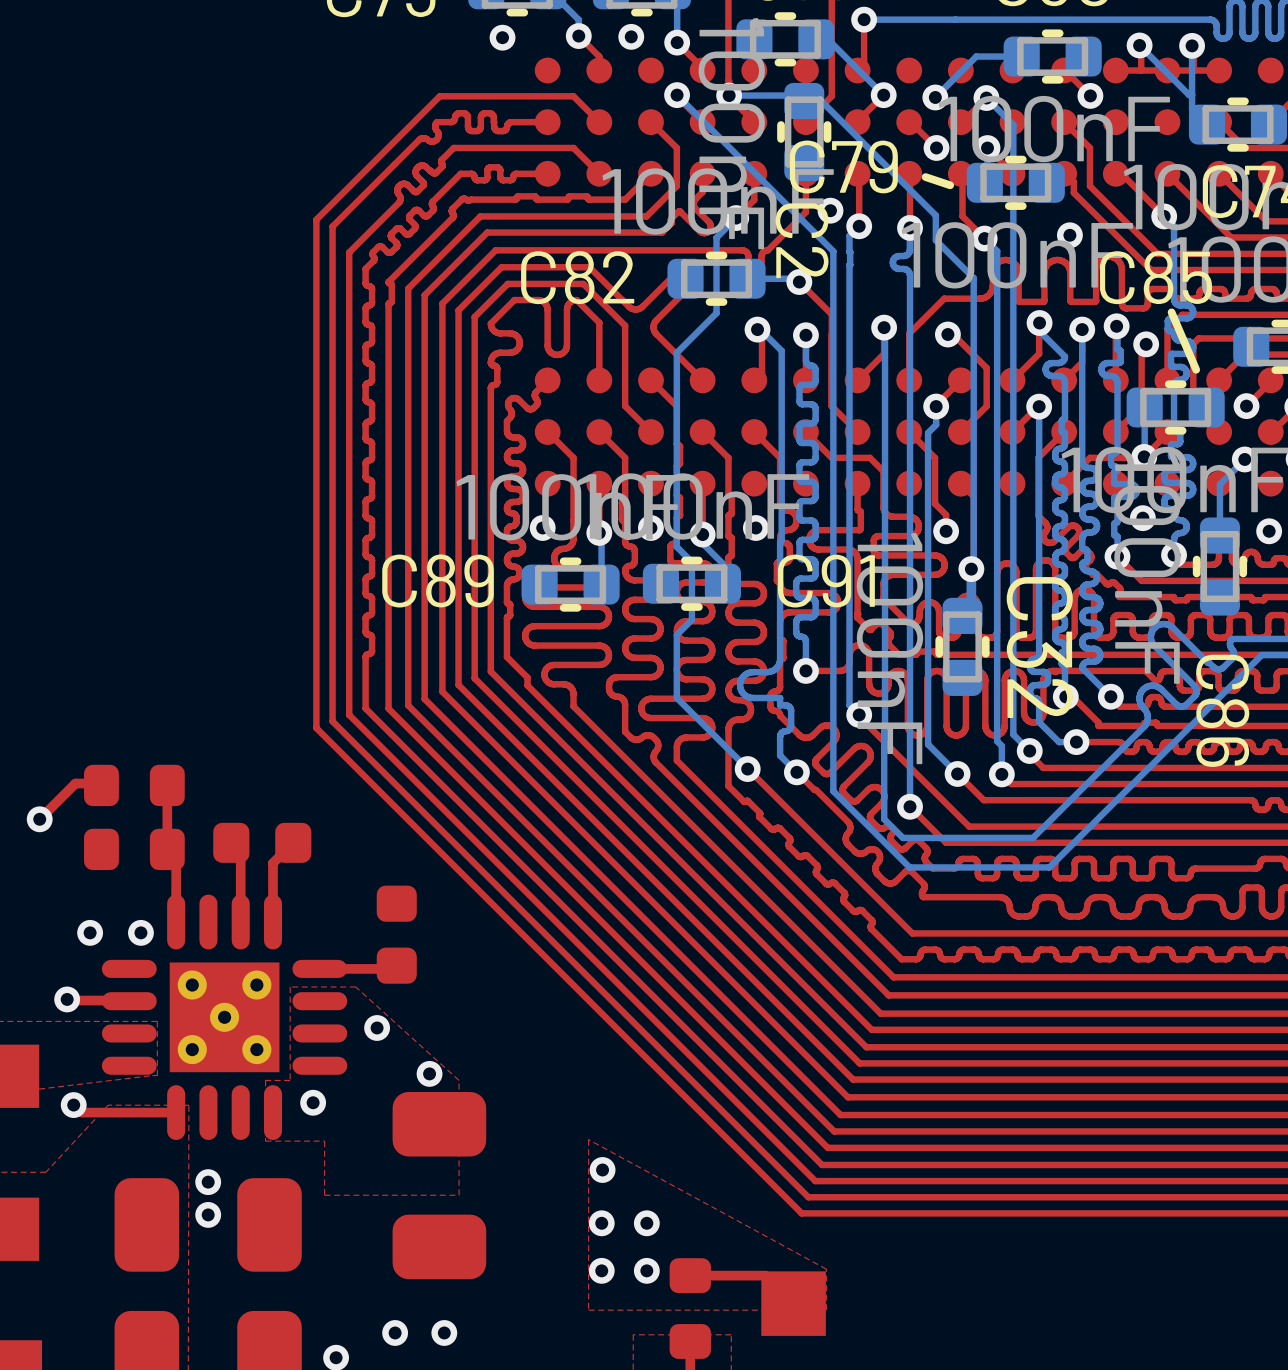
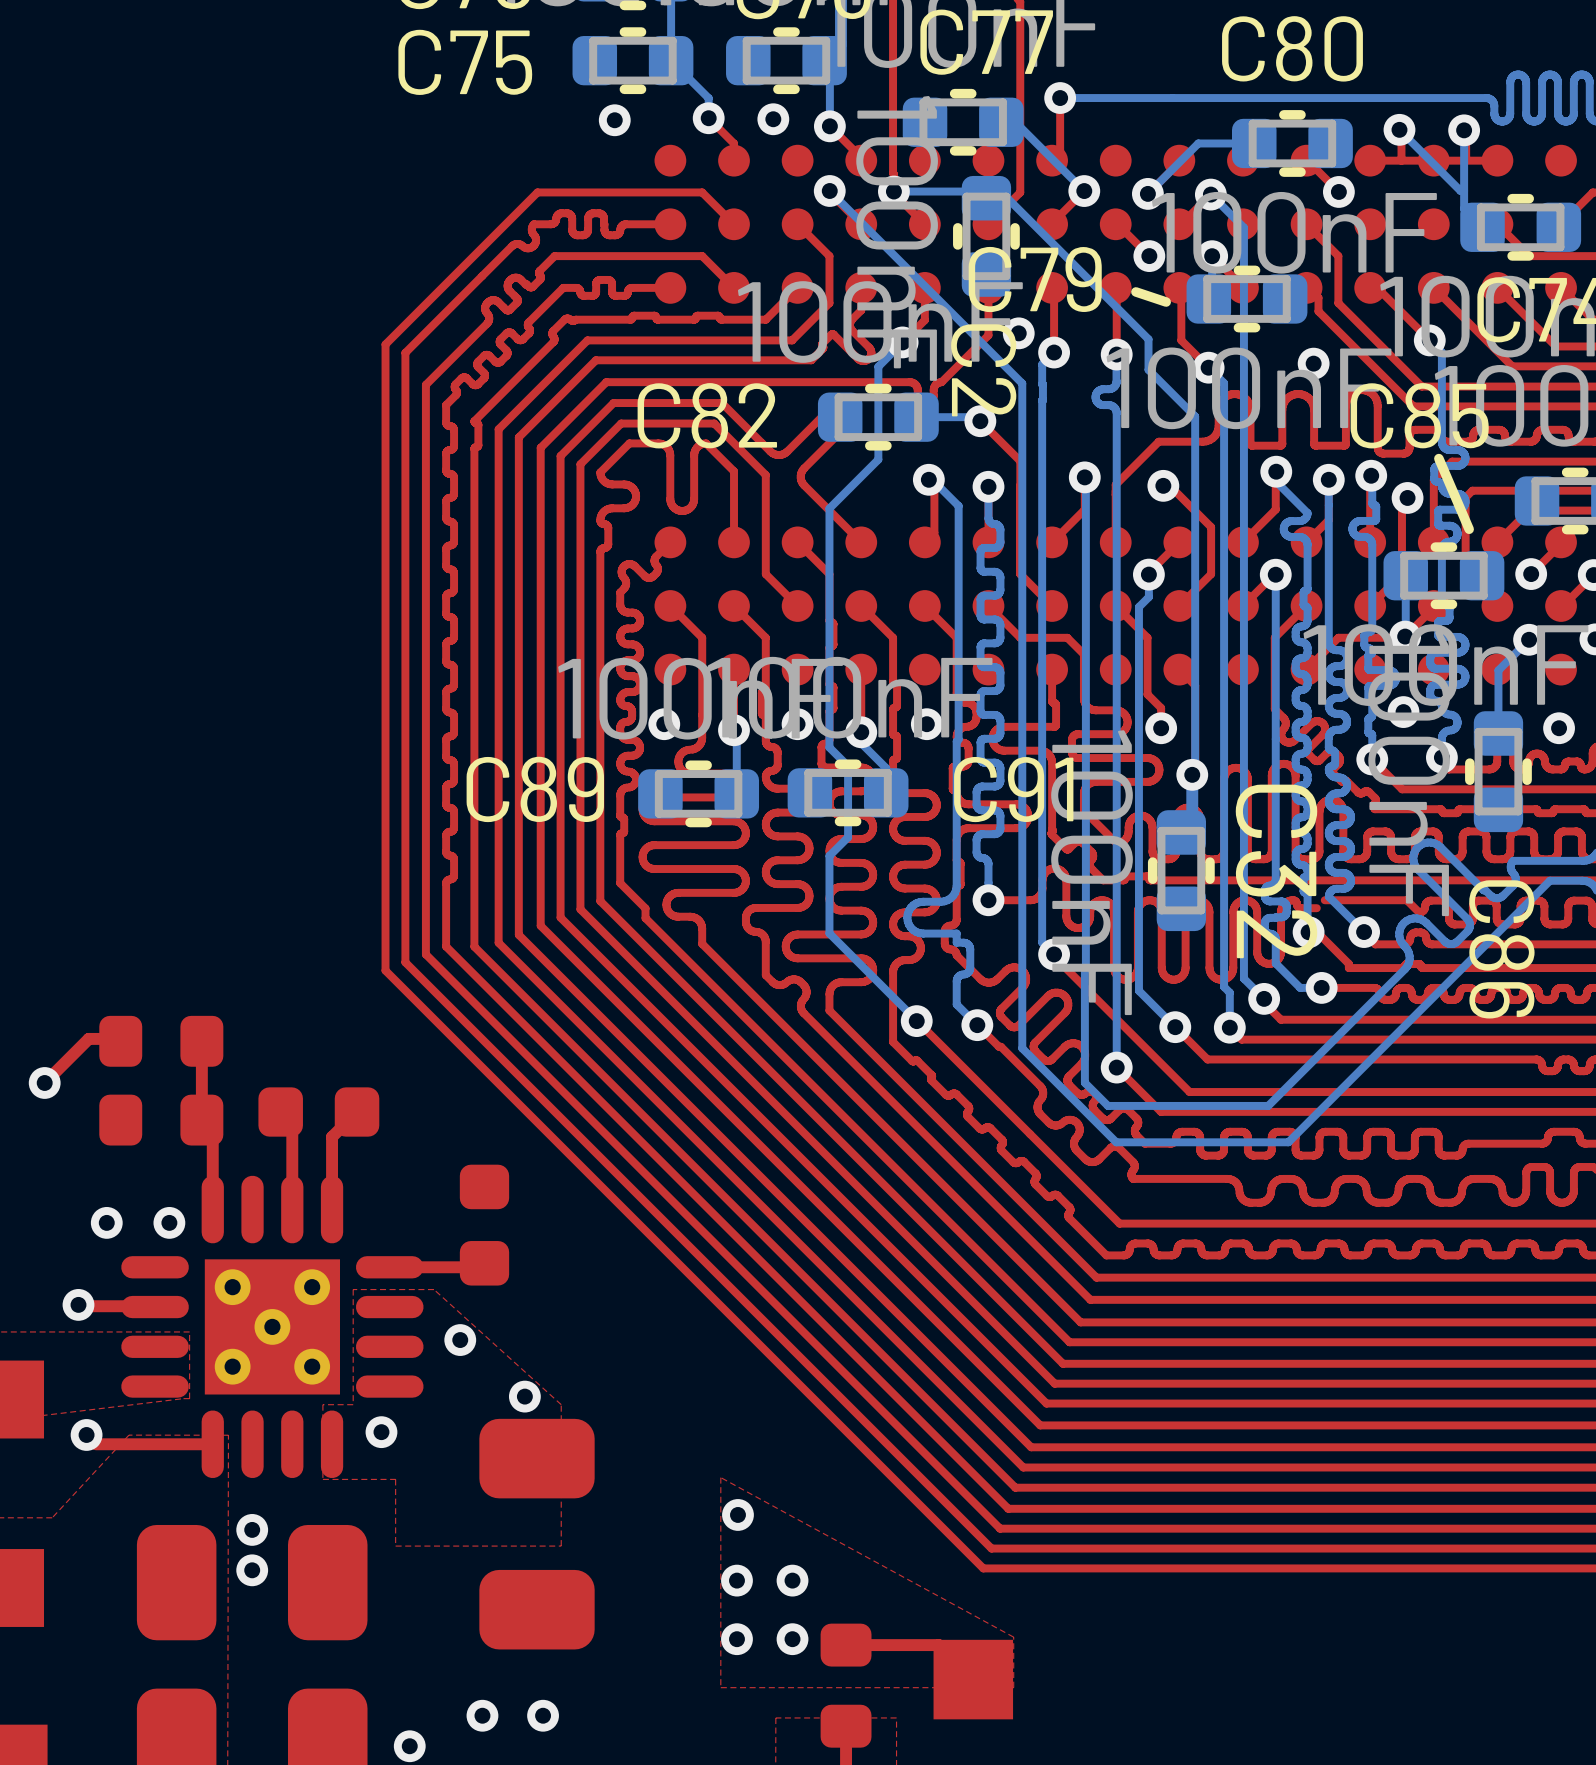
top track: (1078, 670) (1055, 670) -> (1297, 905) (1296, 903)
top track: none -> (1316, 908) (1300, 908)

